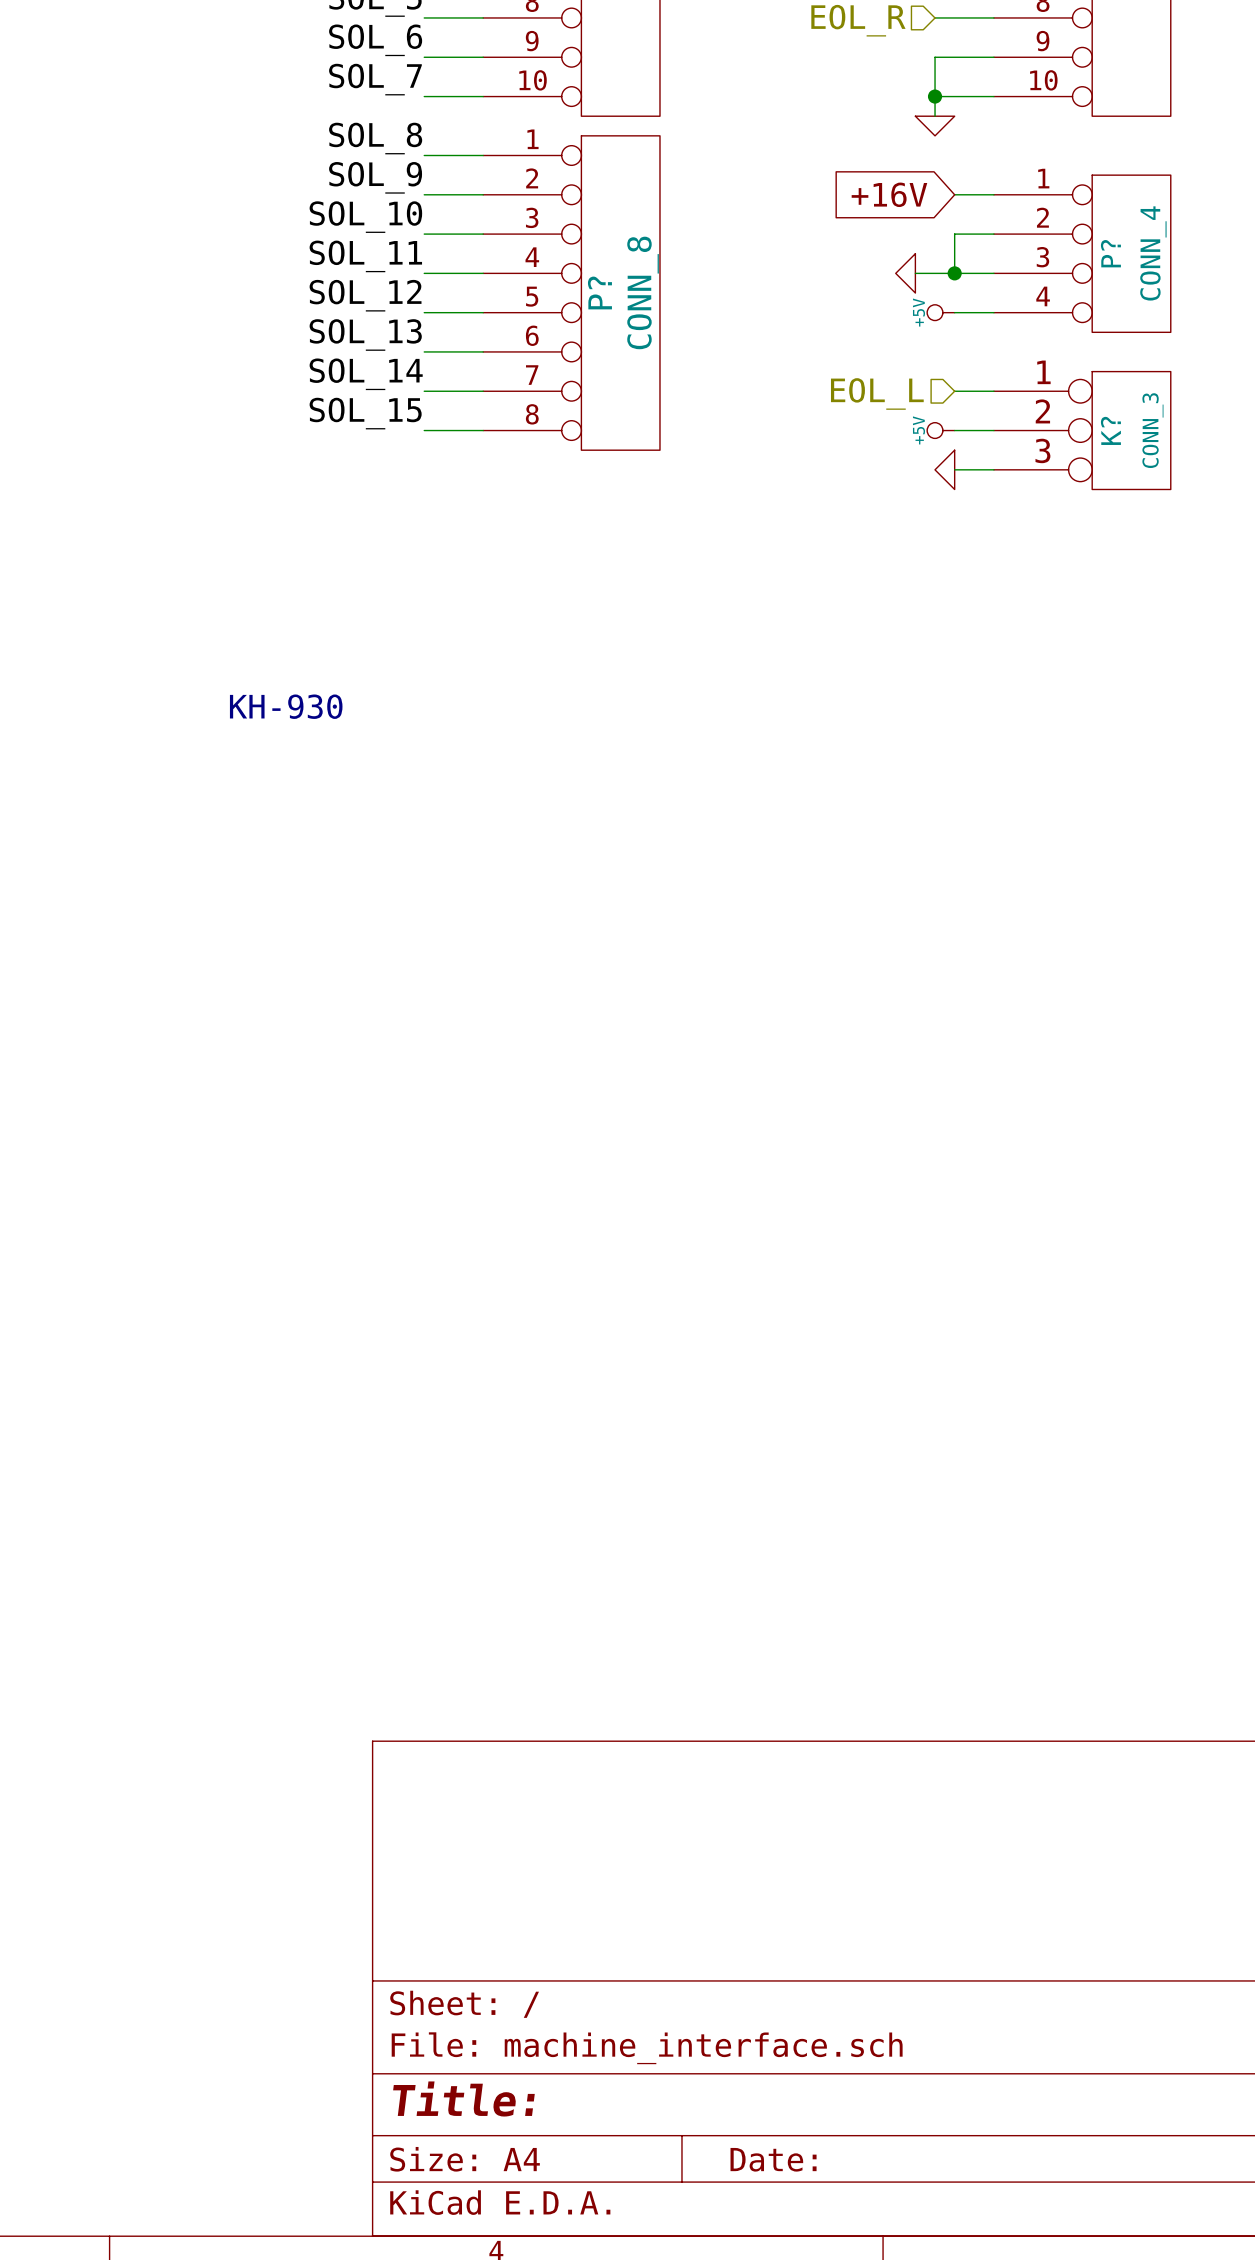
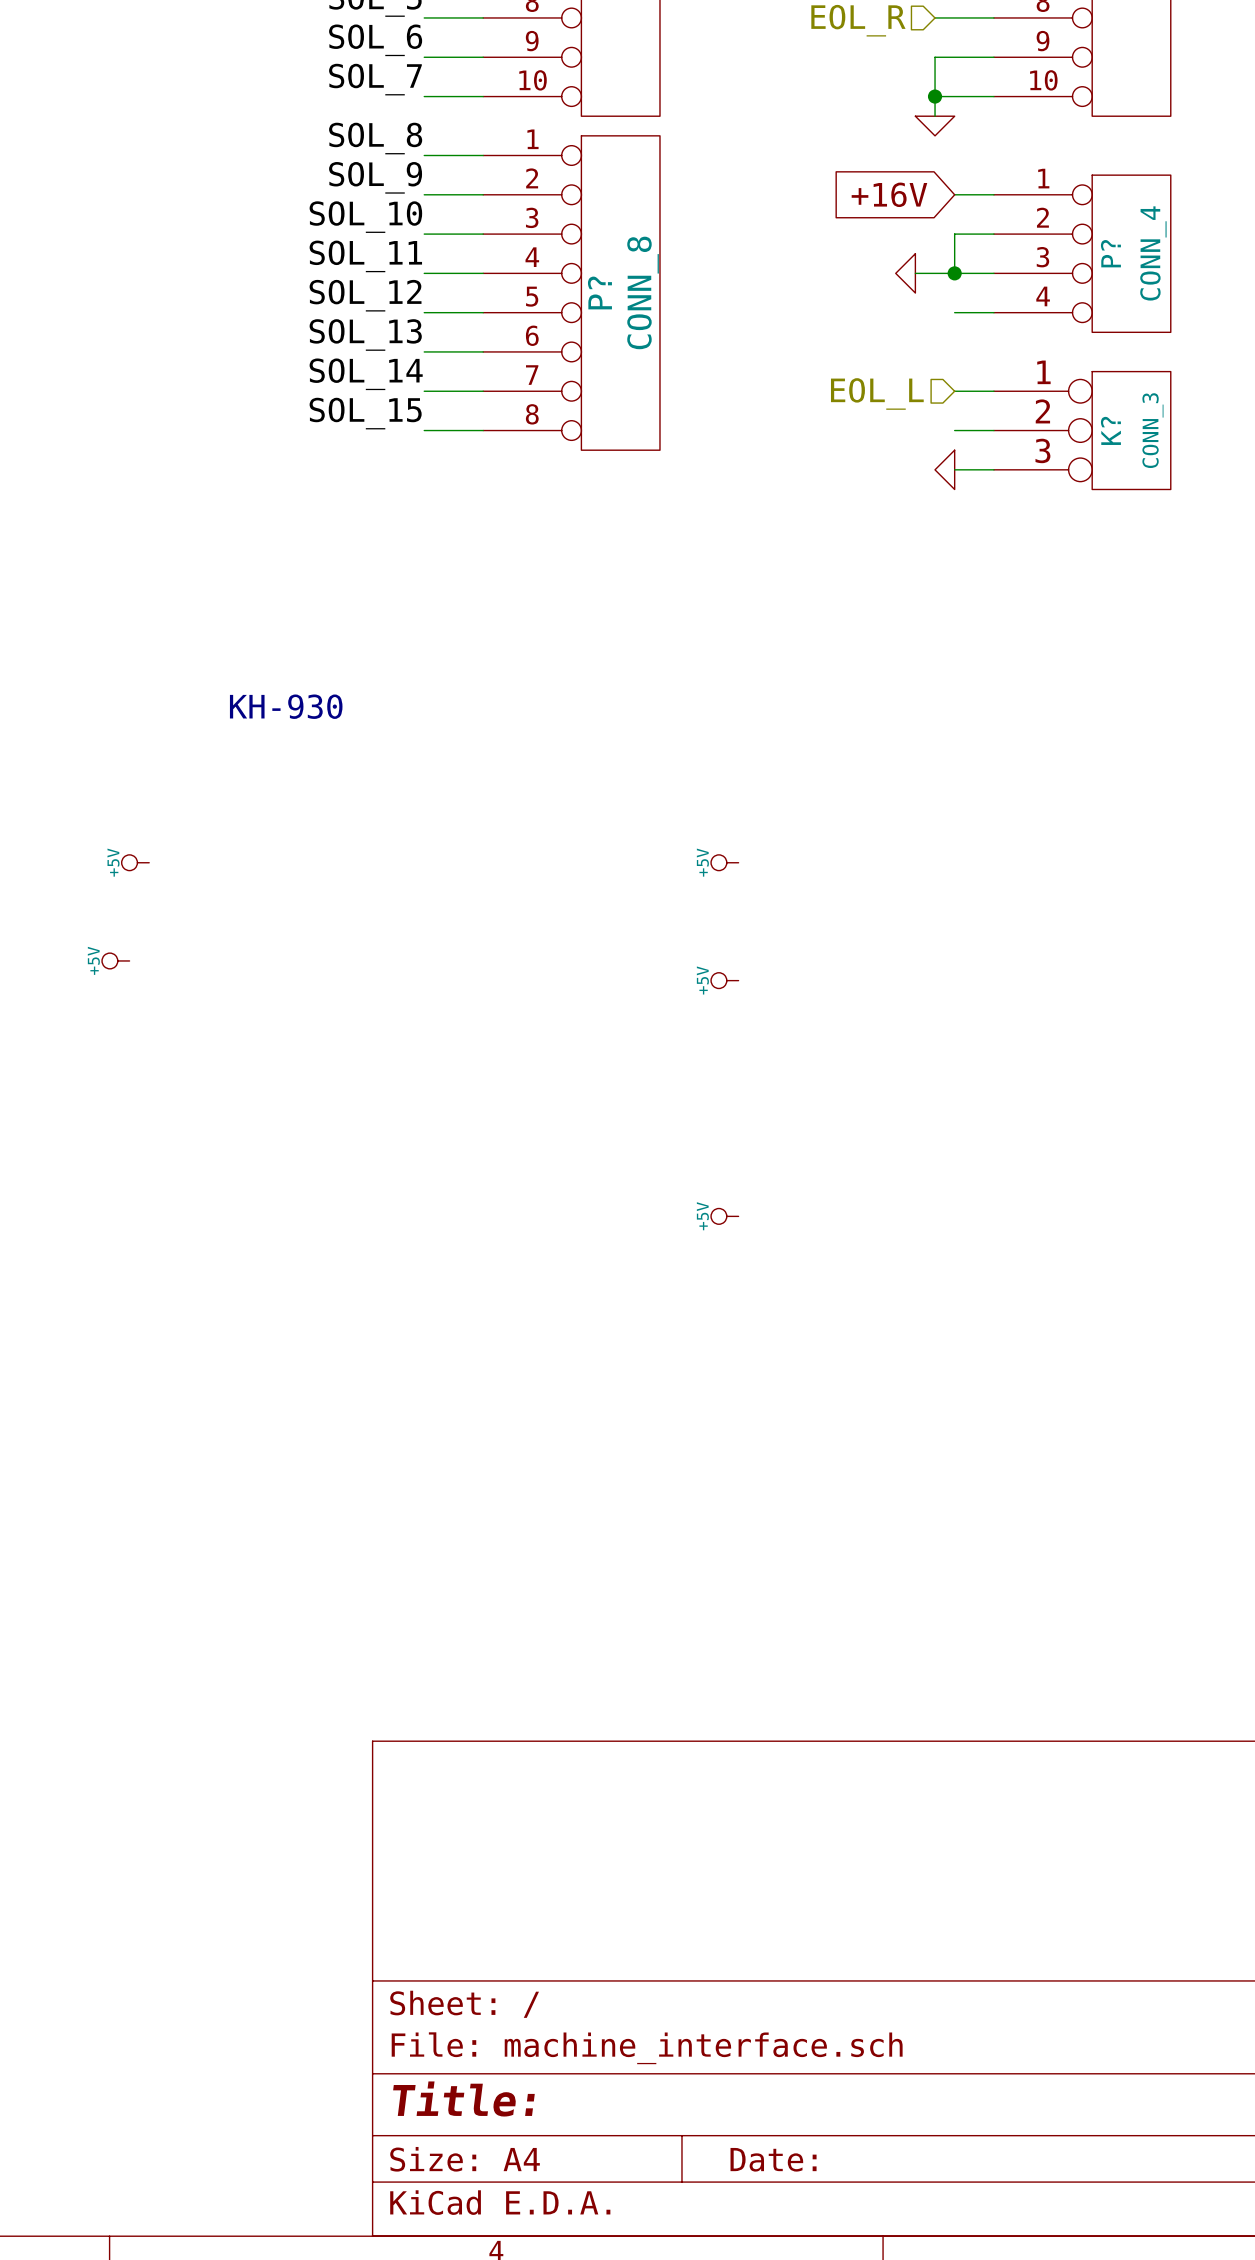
power symbol: +5V (940, 312) -> none
power symbol: +5V (940, 430) -> none
power symbol: none -> +5V (135, 862)
power symbol: none -> +5V (724, 862)
power symbol: none -> +5V (115, 960)
power symbol: none -> +5V (724, 980)
power symbol: none -> +5V (724, 1216)

